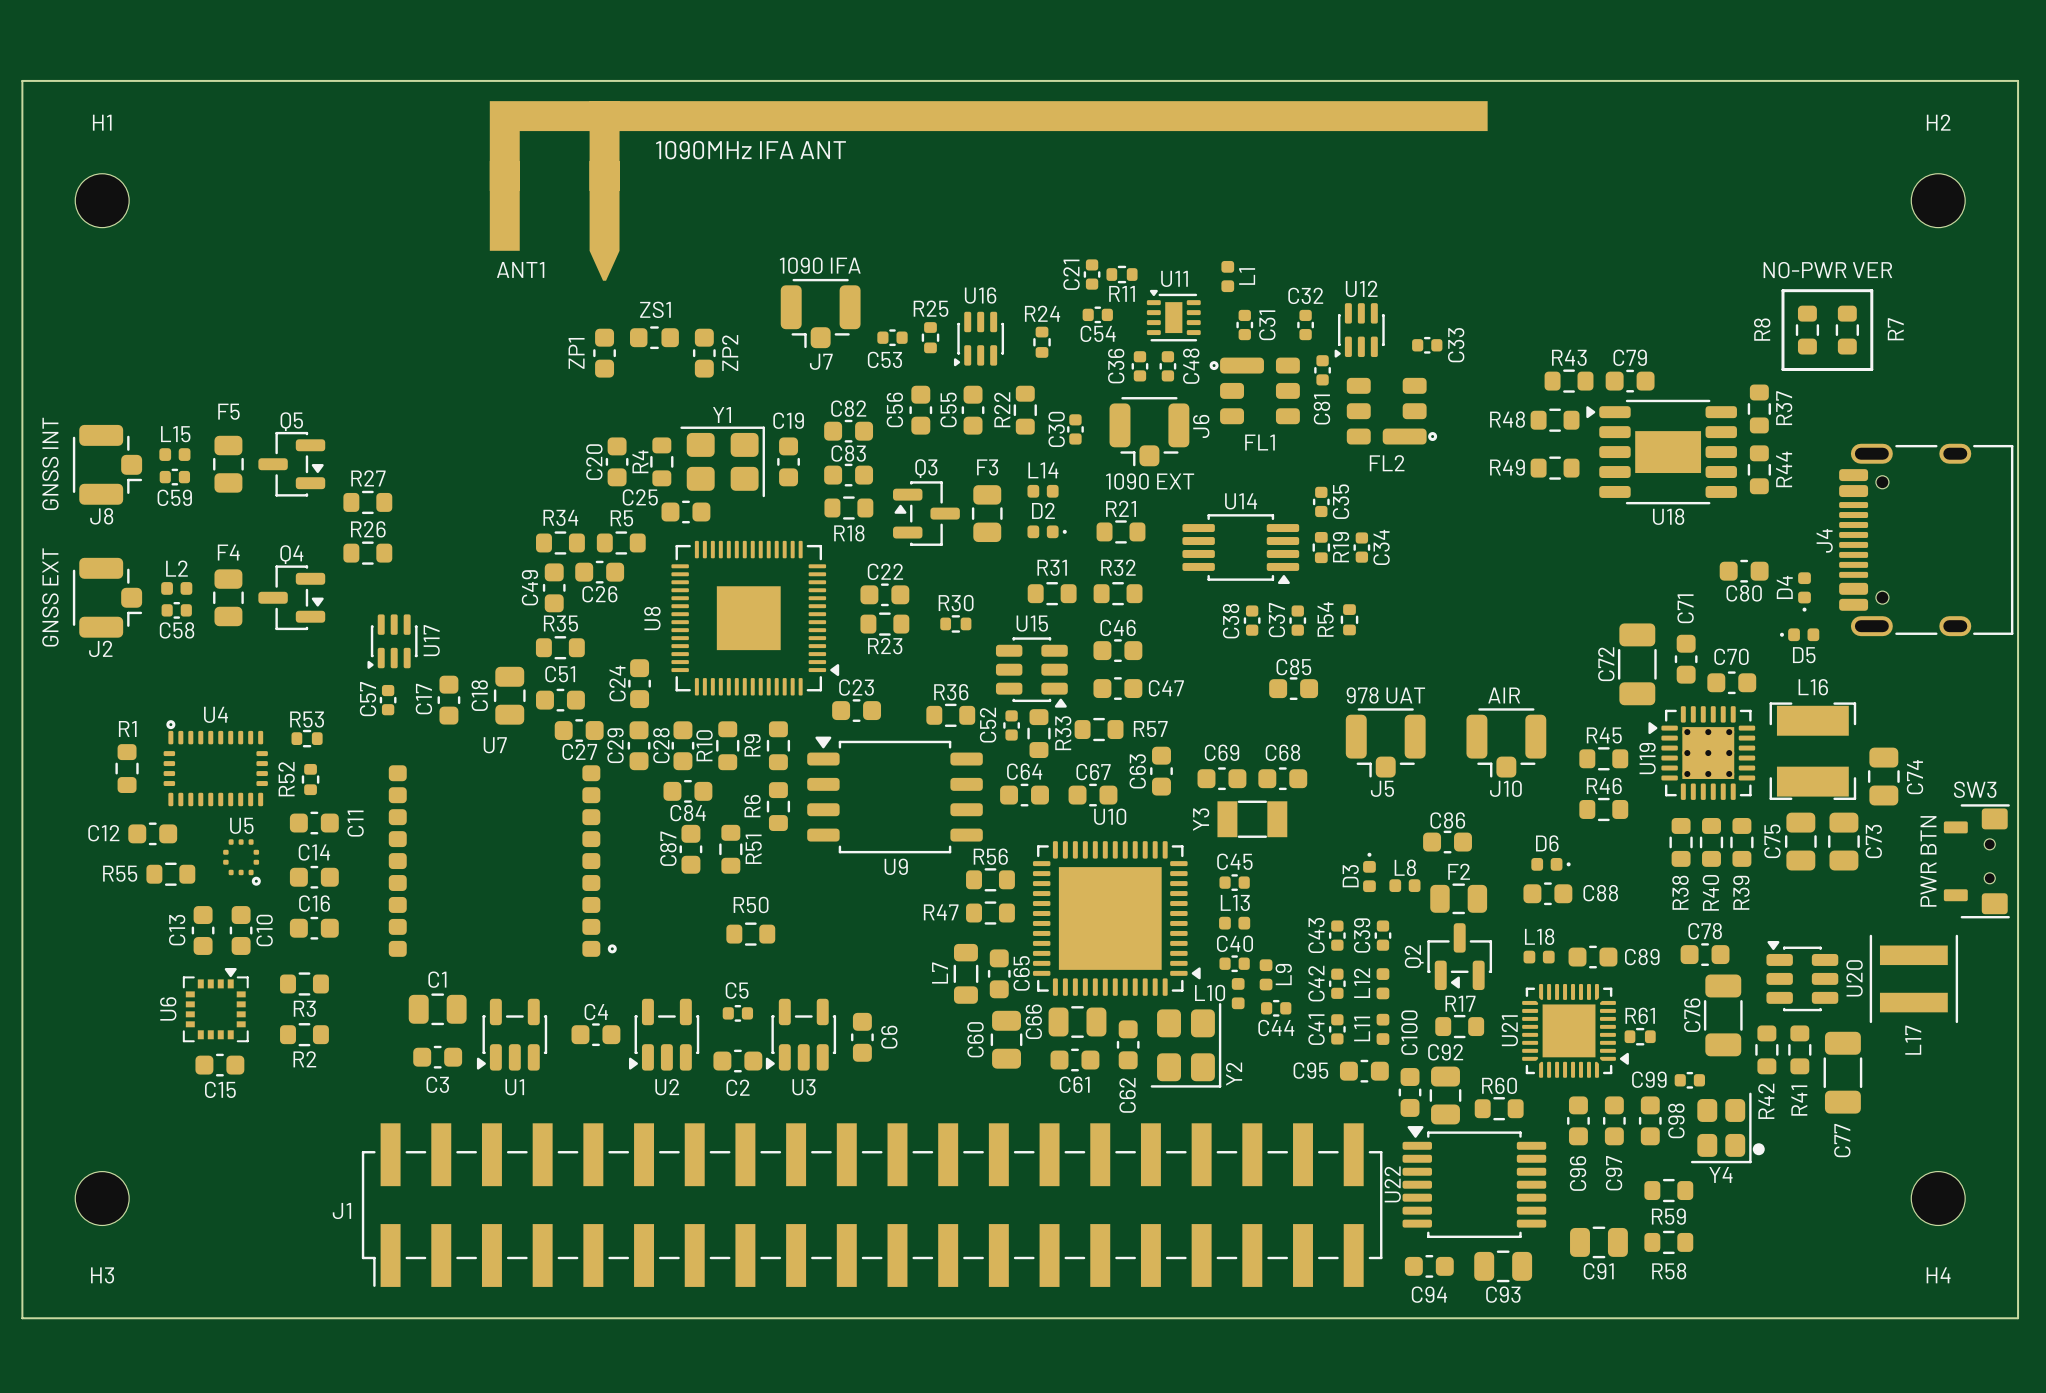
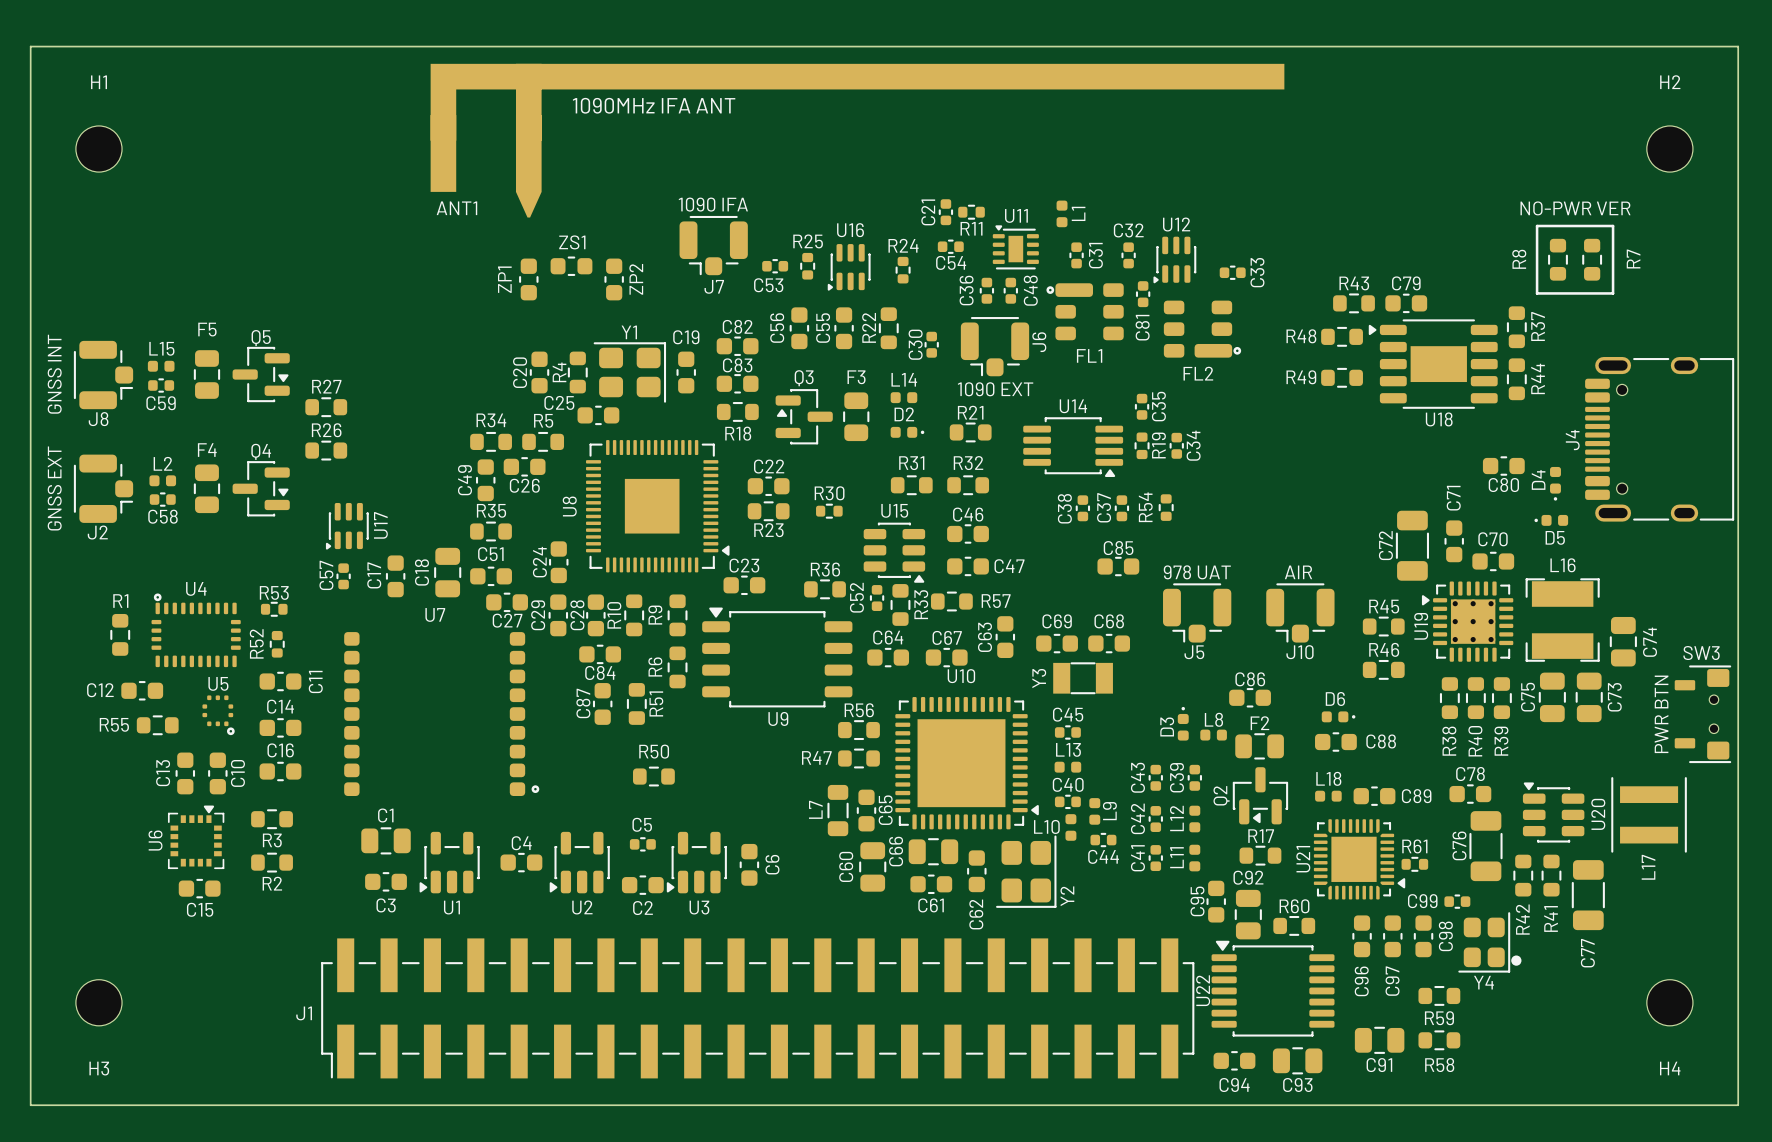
C95 rotation: 0° (1364, 1071) -> 90° clockwise (1216, 901)
C95 position: (1364, 1071) -> (1216, 901)
C100: (1410, 1092) -> none

